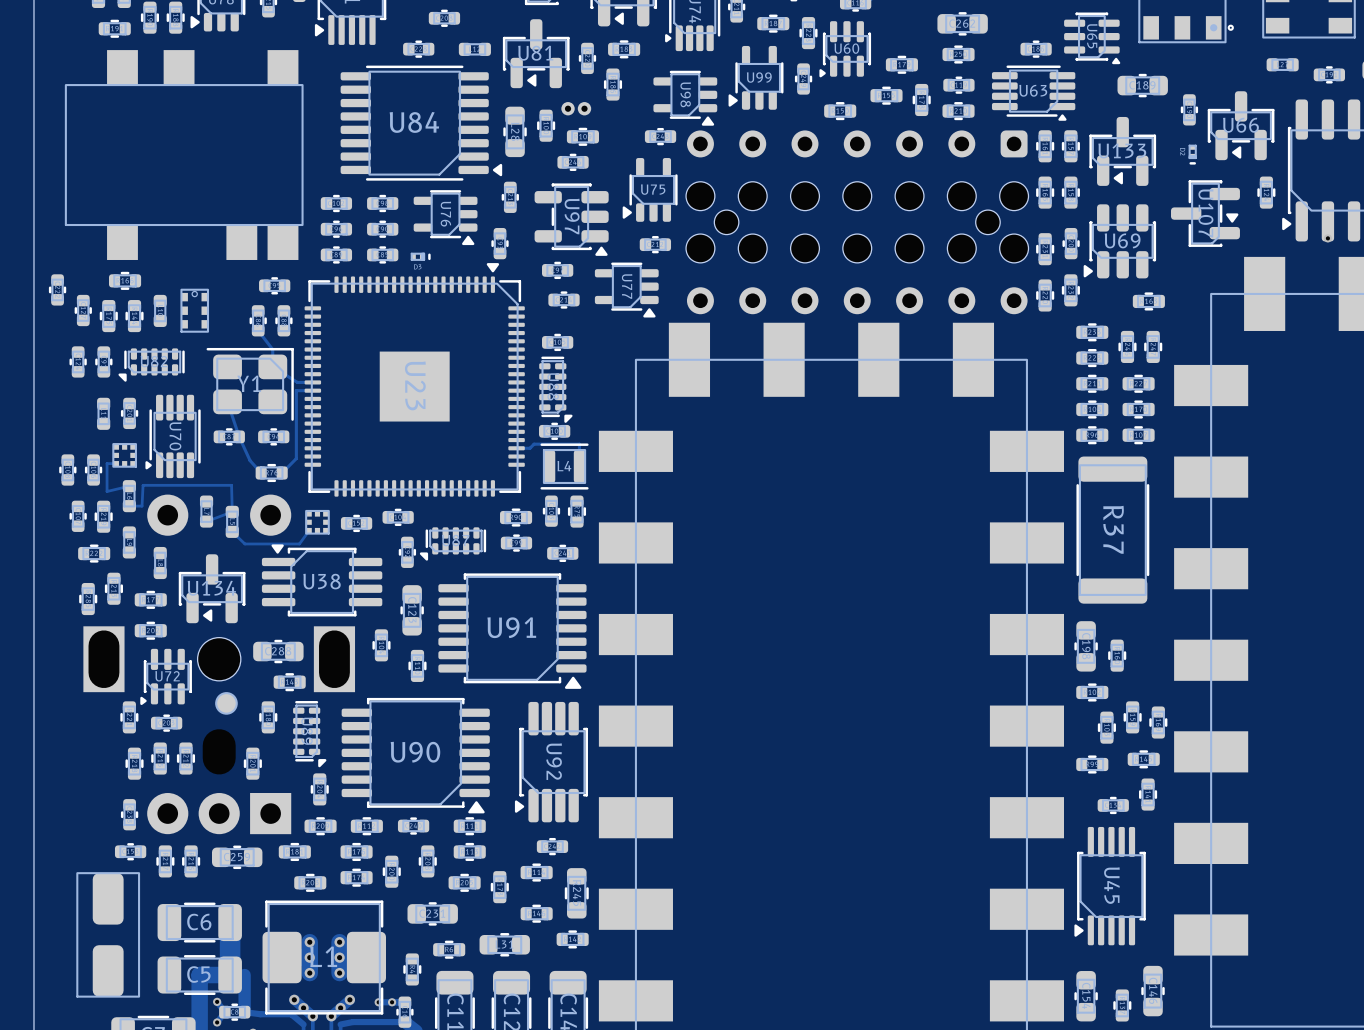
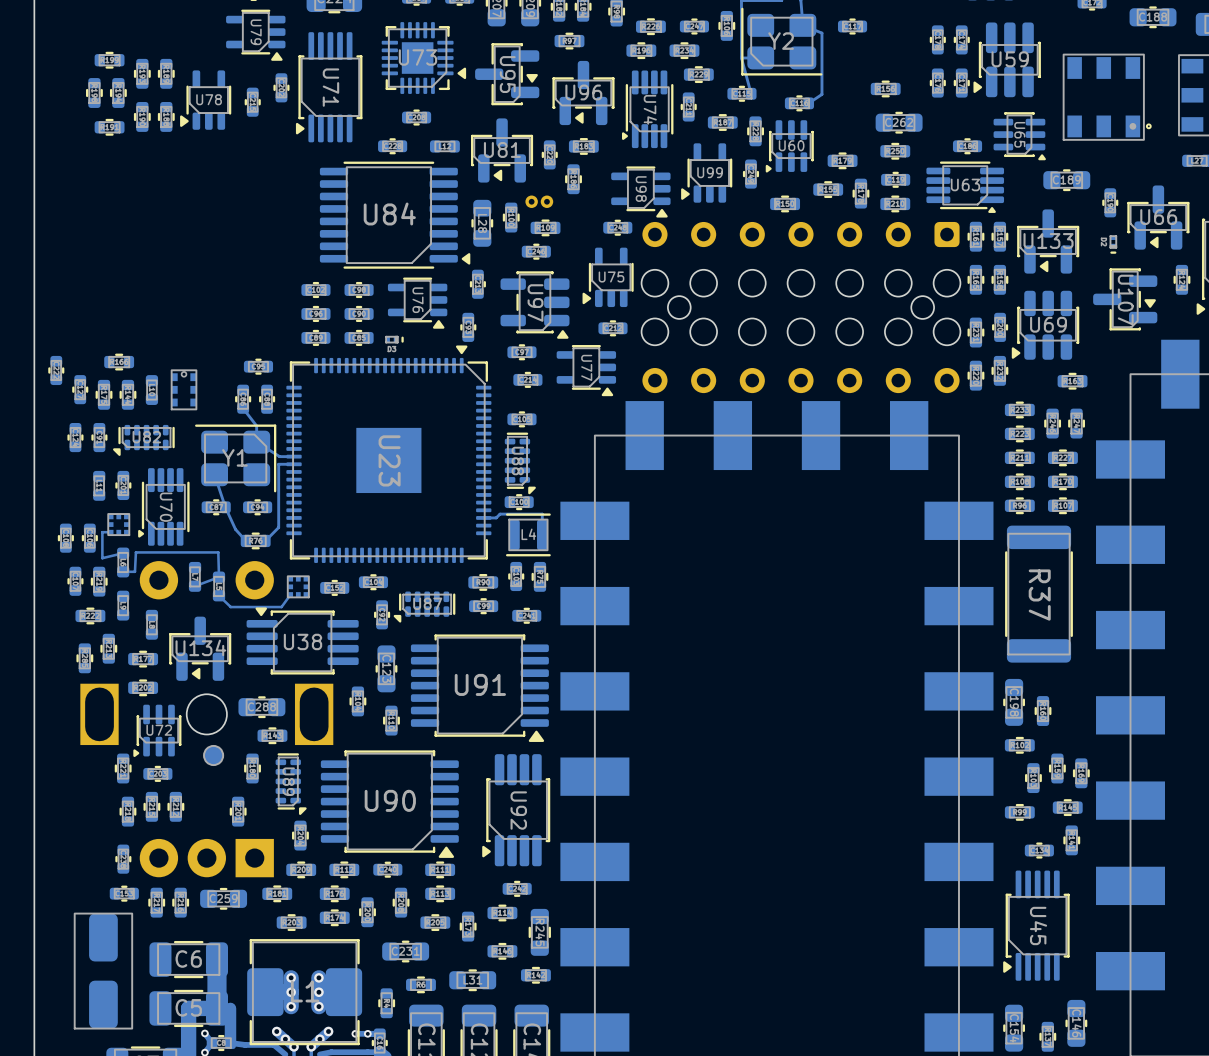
part: (184, 155) -> none

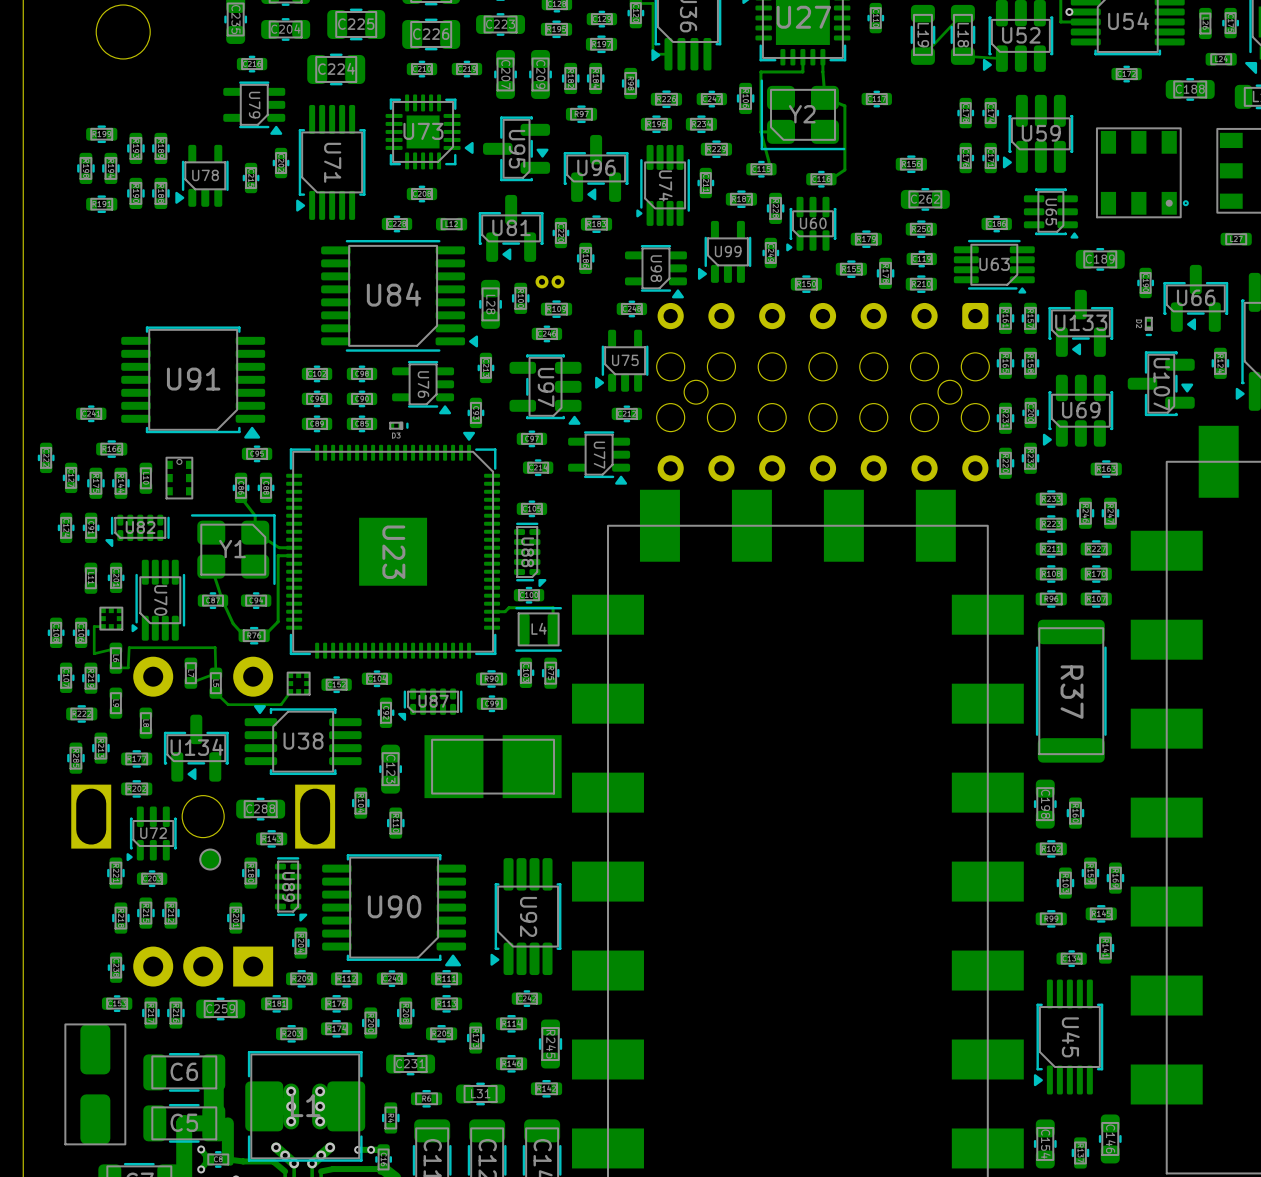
part position: (526, 615) -> (91, 413)
part: none -> (493, 766)
U91 position: (479, 688) -> (193, 382)

